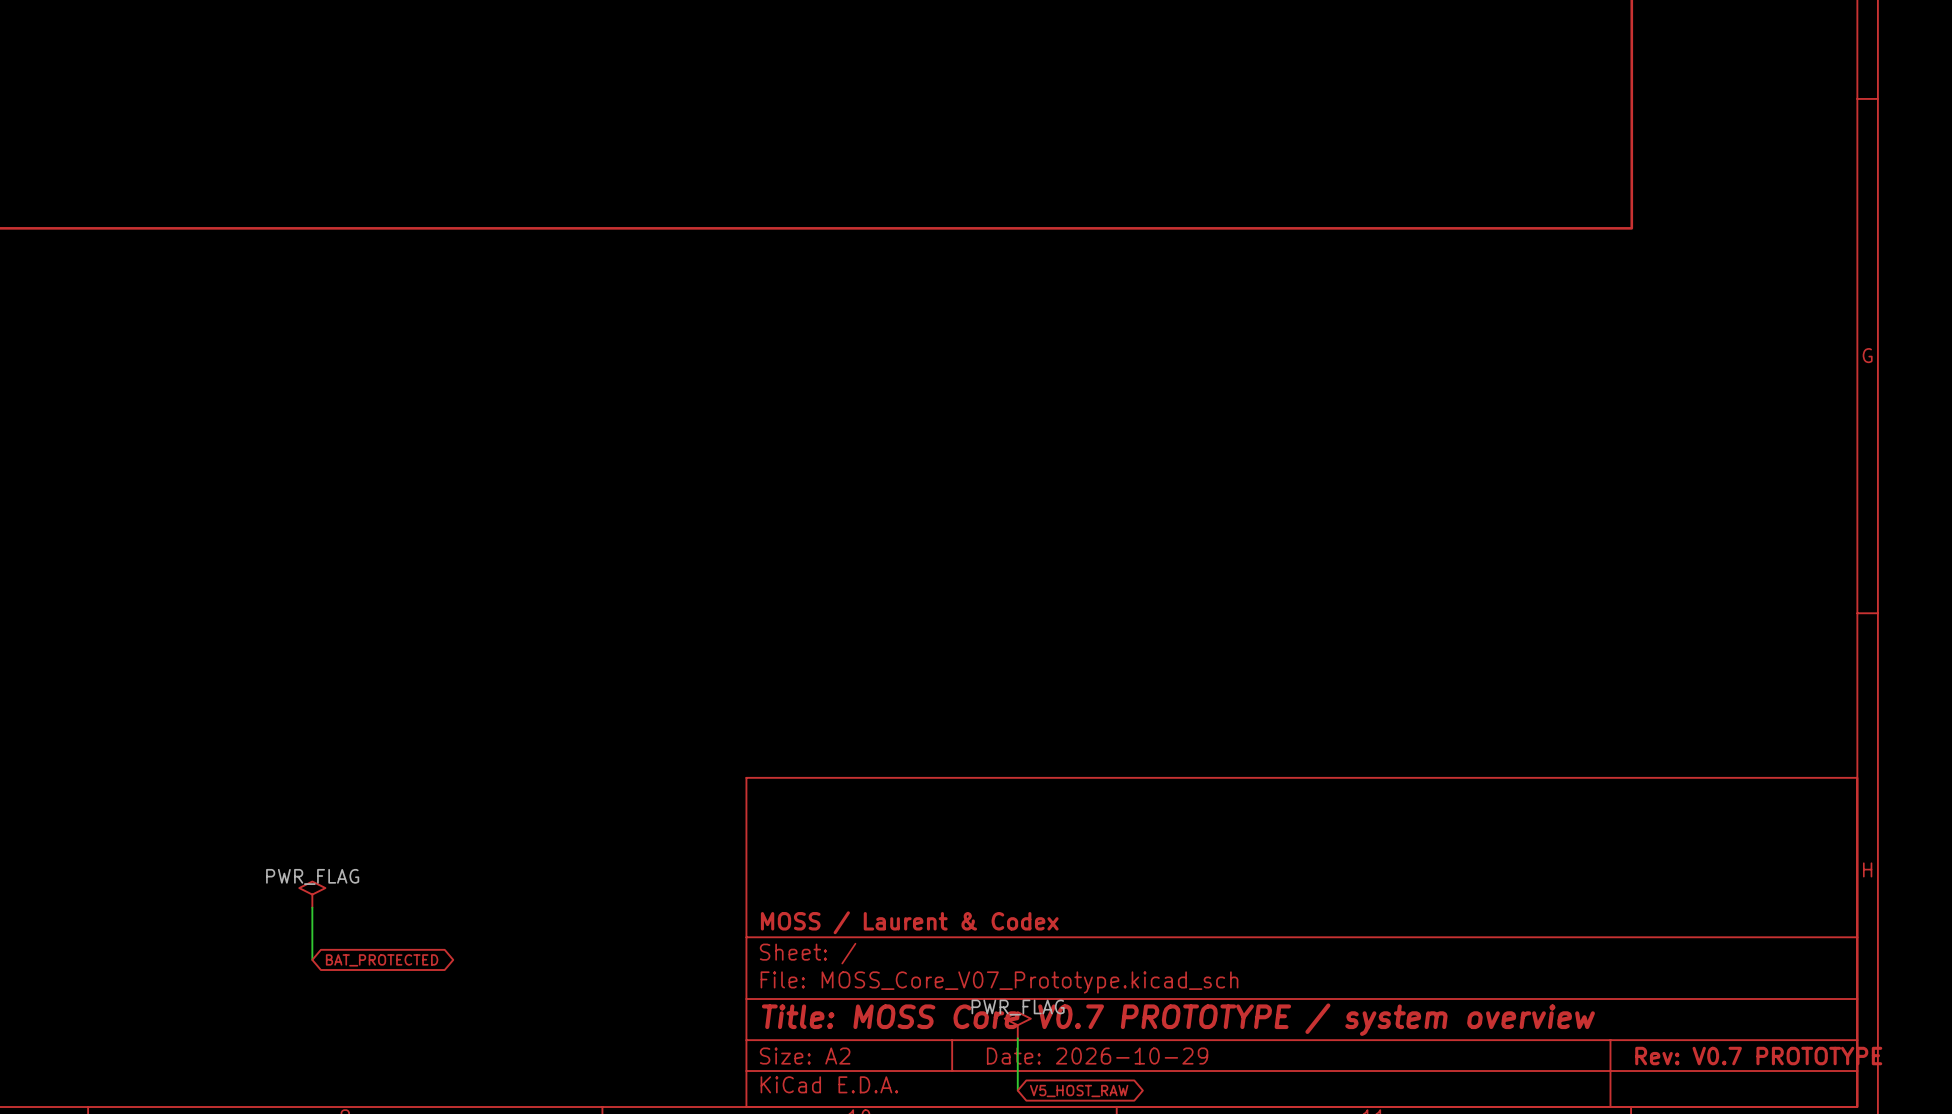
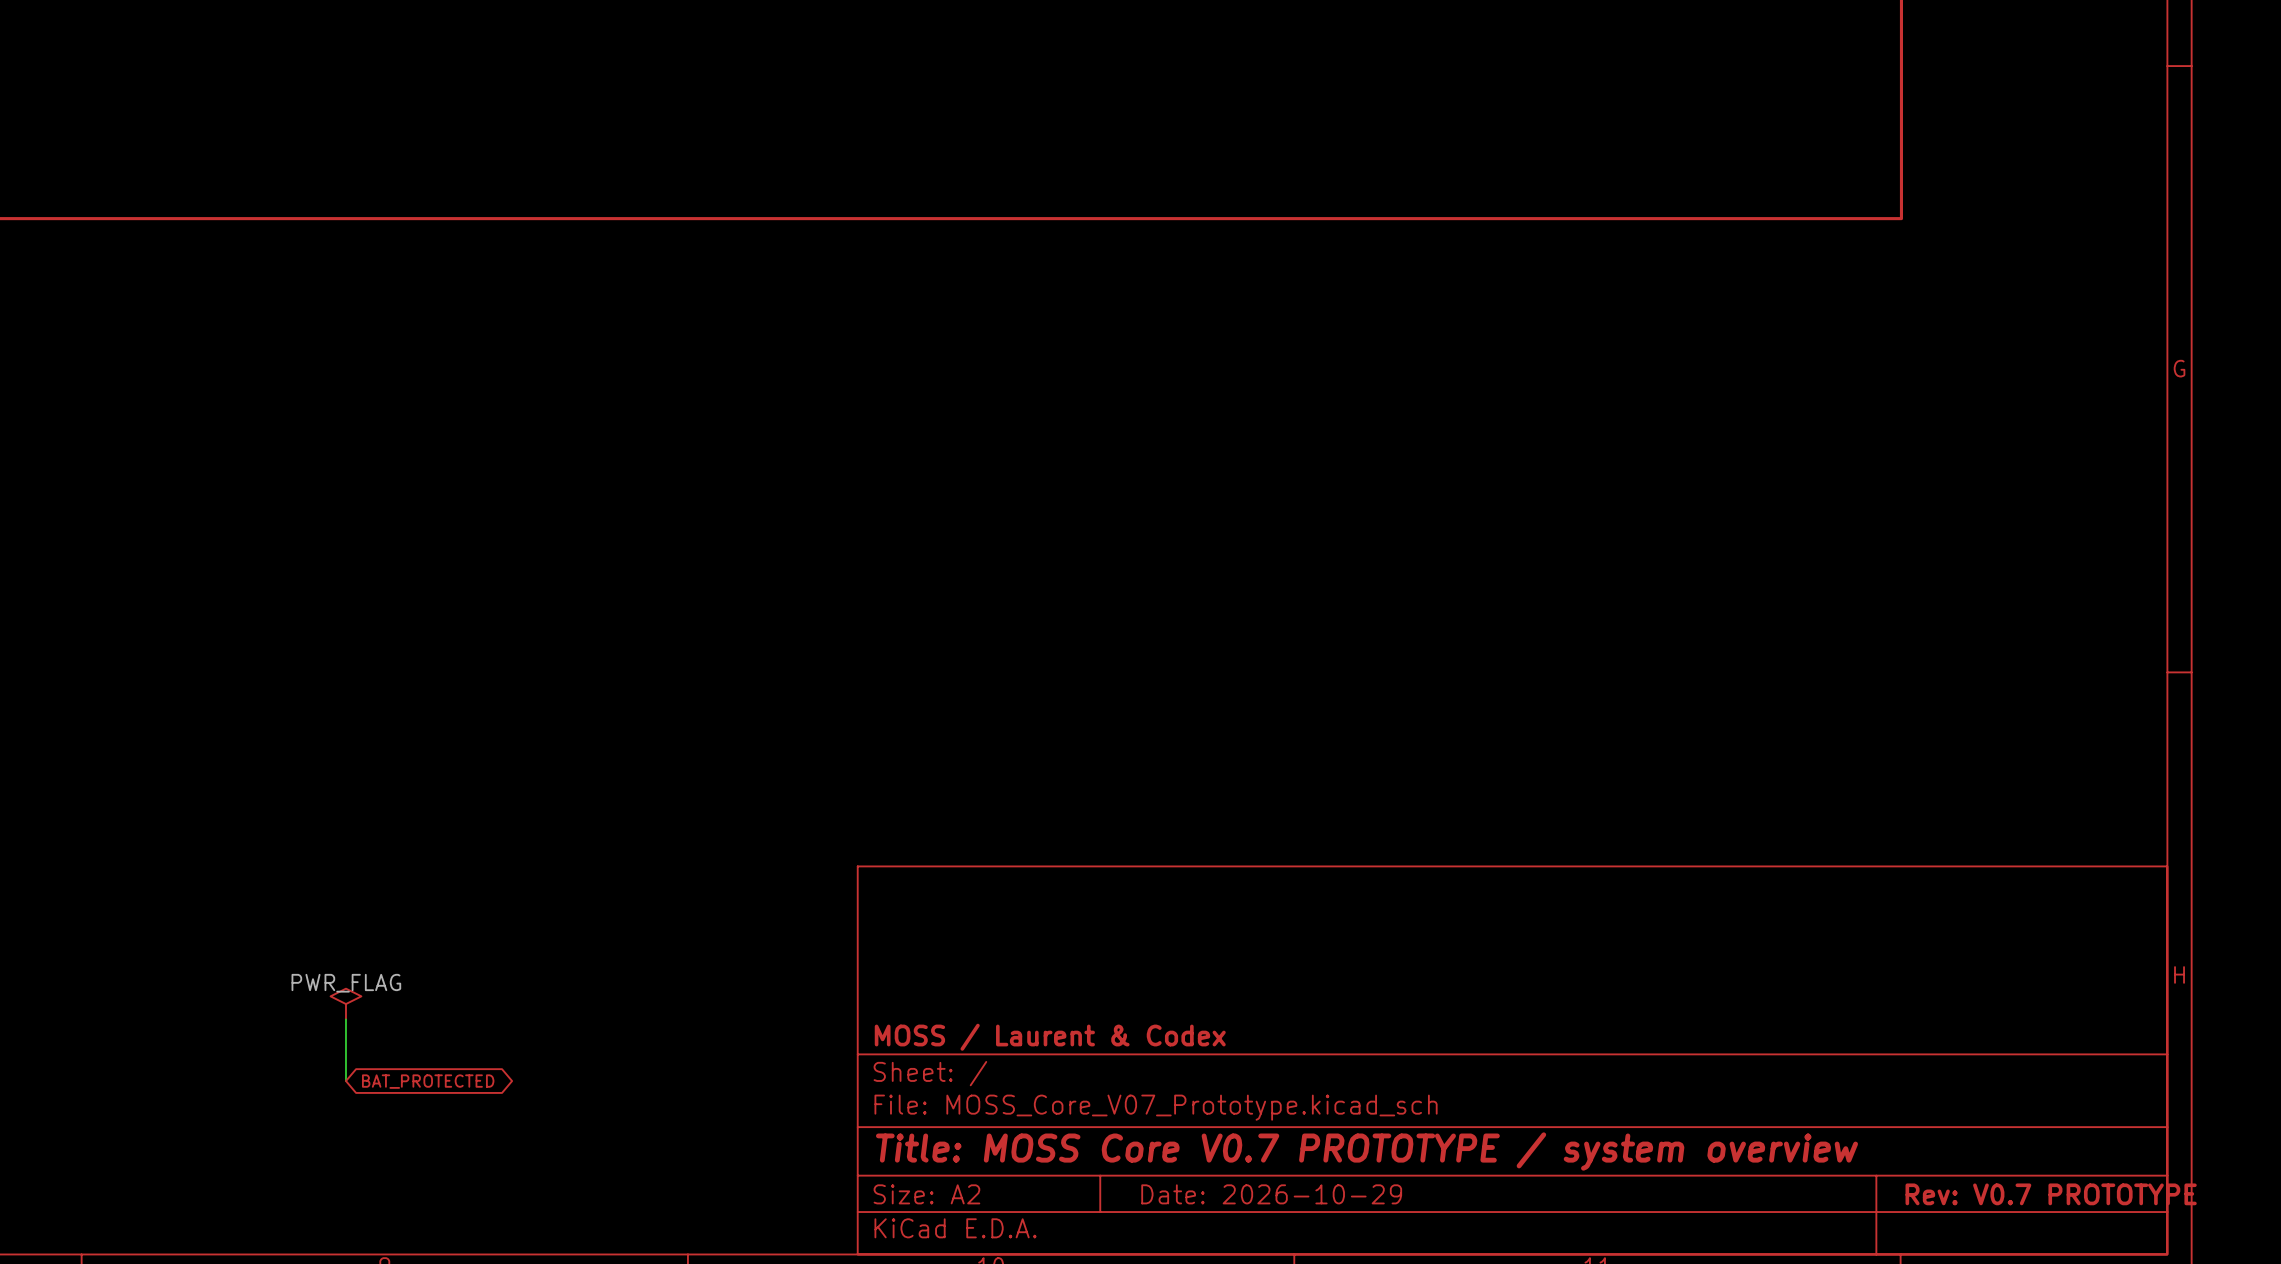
power symbol: PWR_FLAG (1017, 1025) -> none
wire: (1017, 1038) (1017, 1090) -> none
global label: V5_HOST_RAW (1079, 1091) -> none

